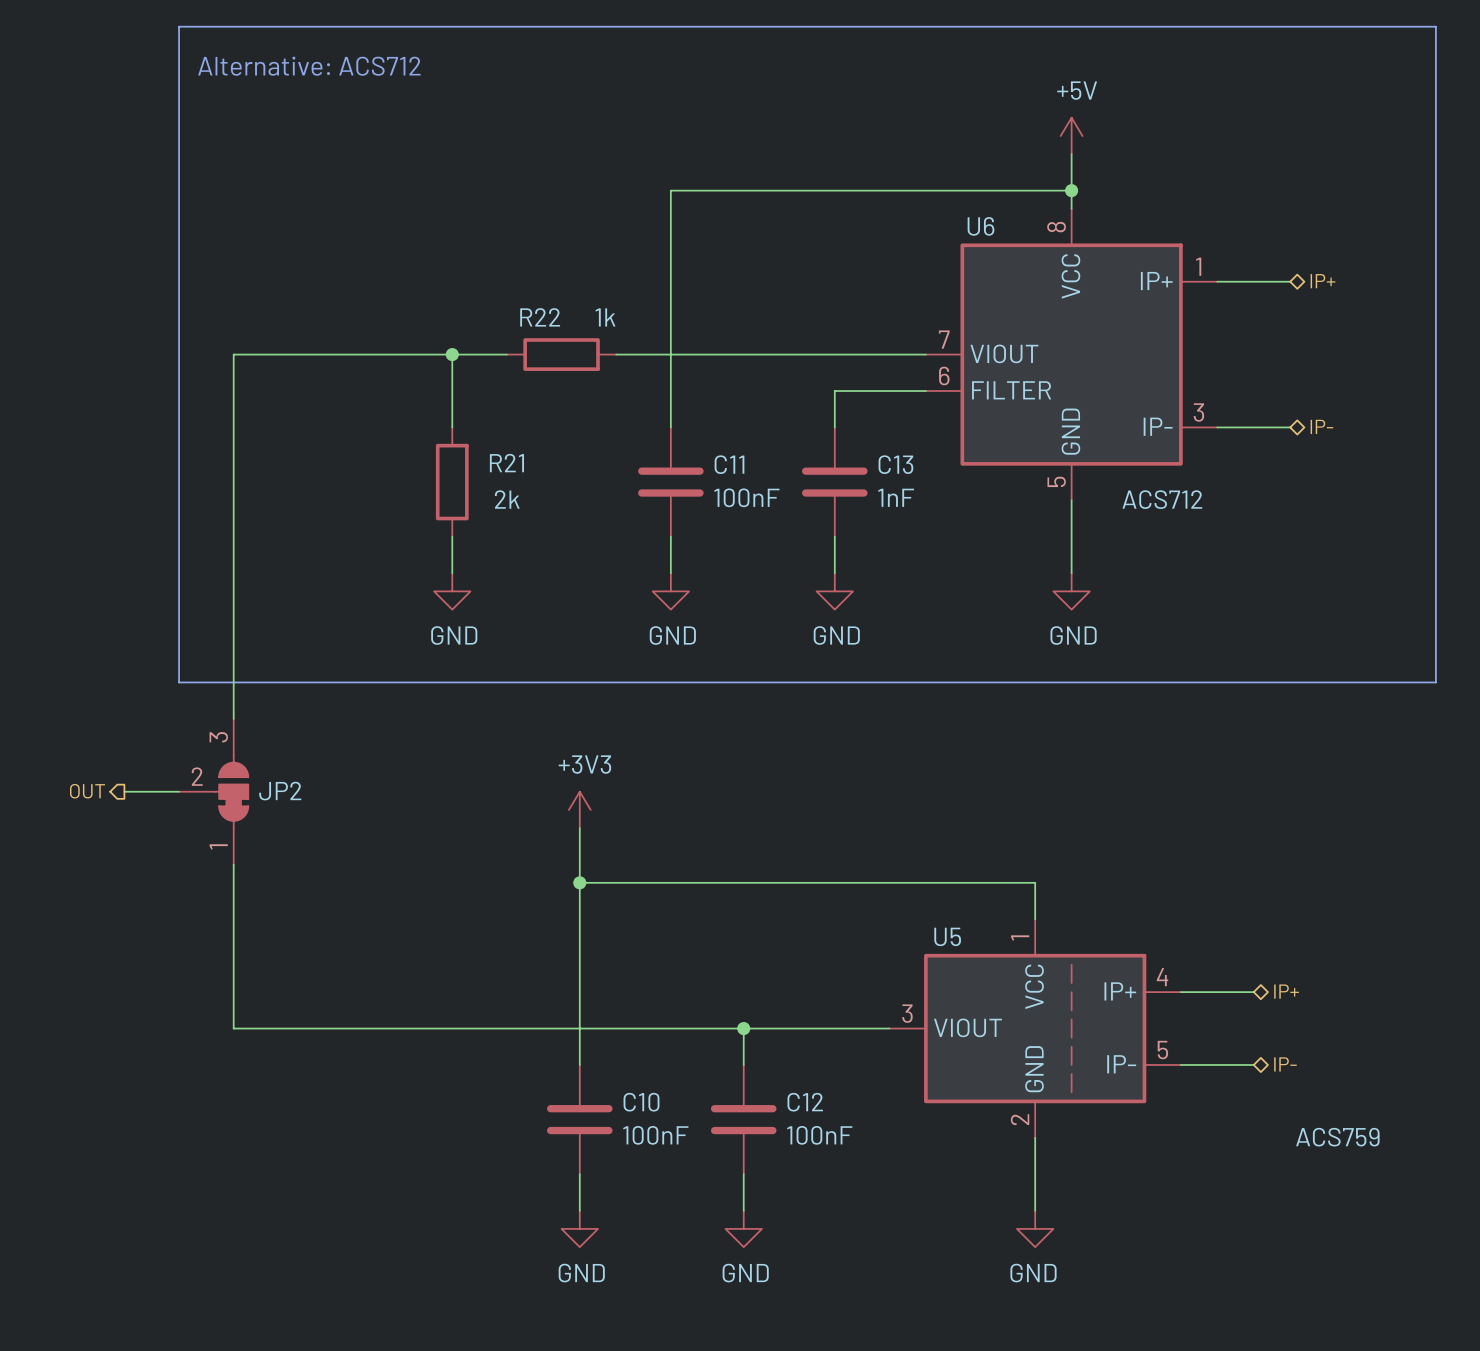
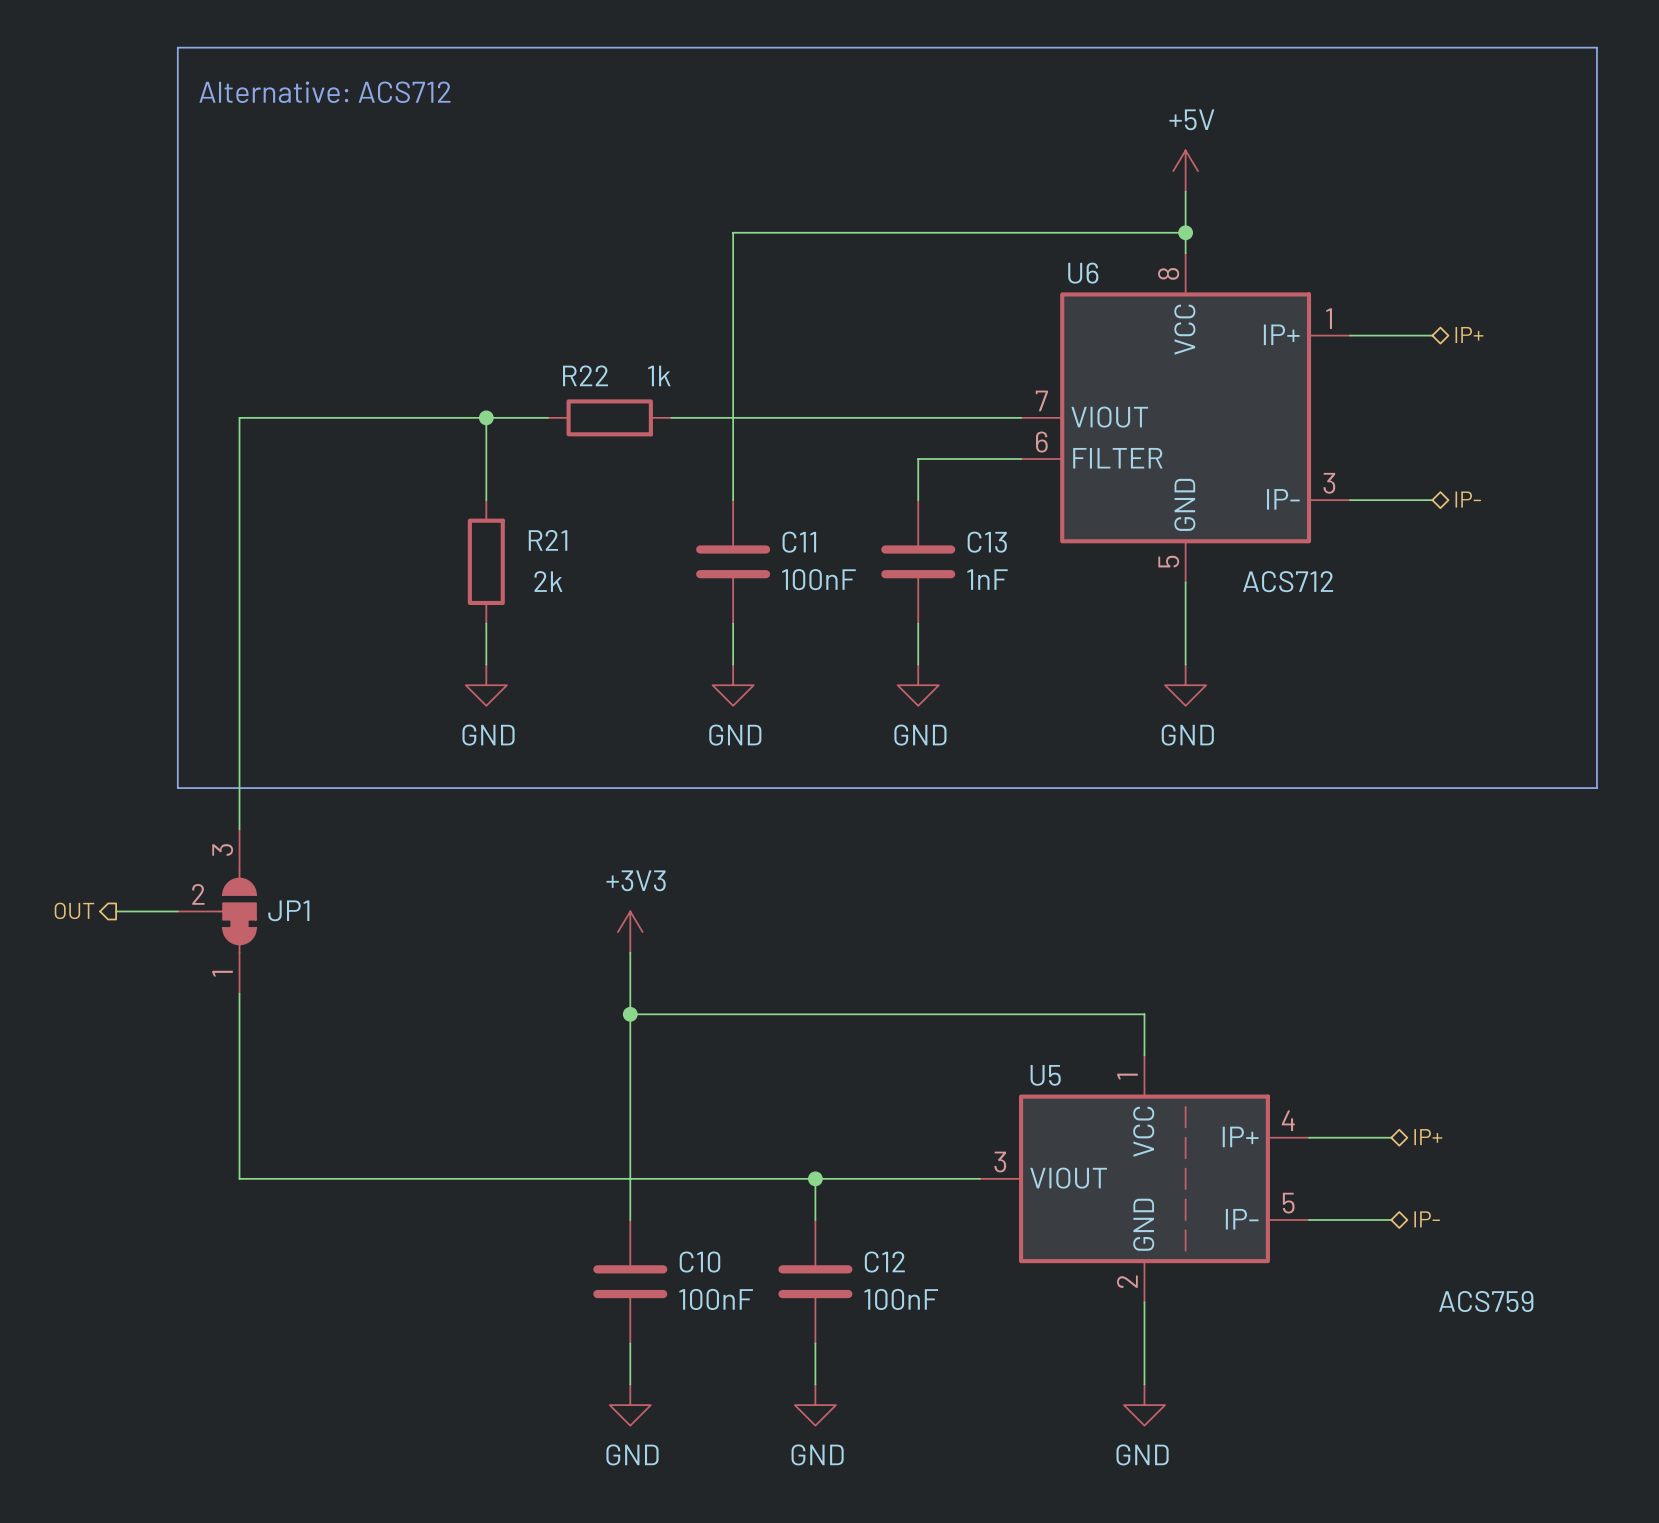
JP2 name: JP2 (280, 791) -> JP1 (288, 910)

